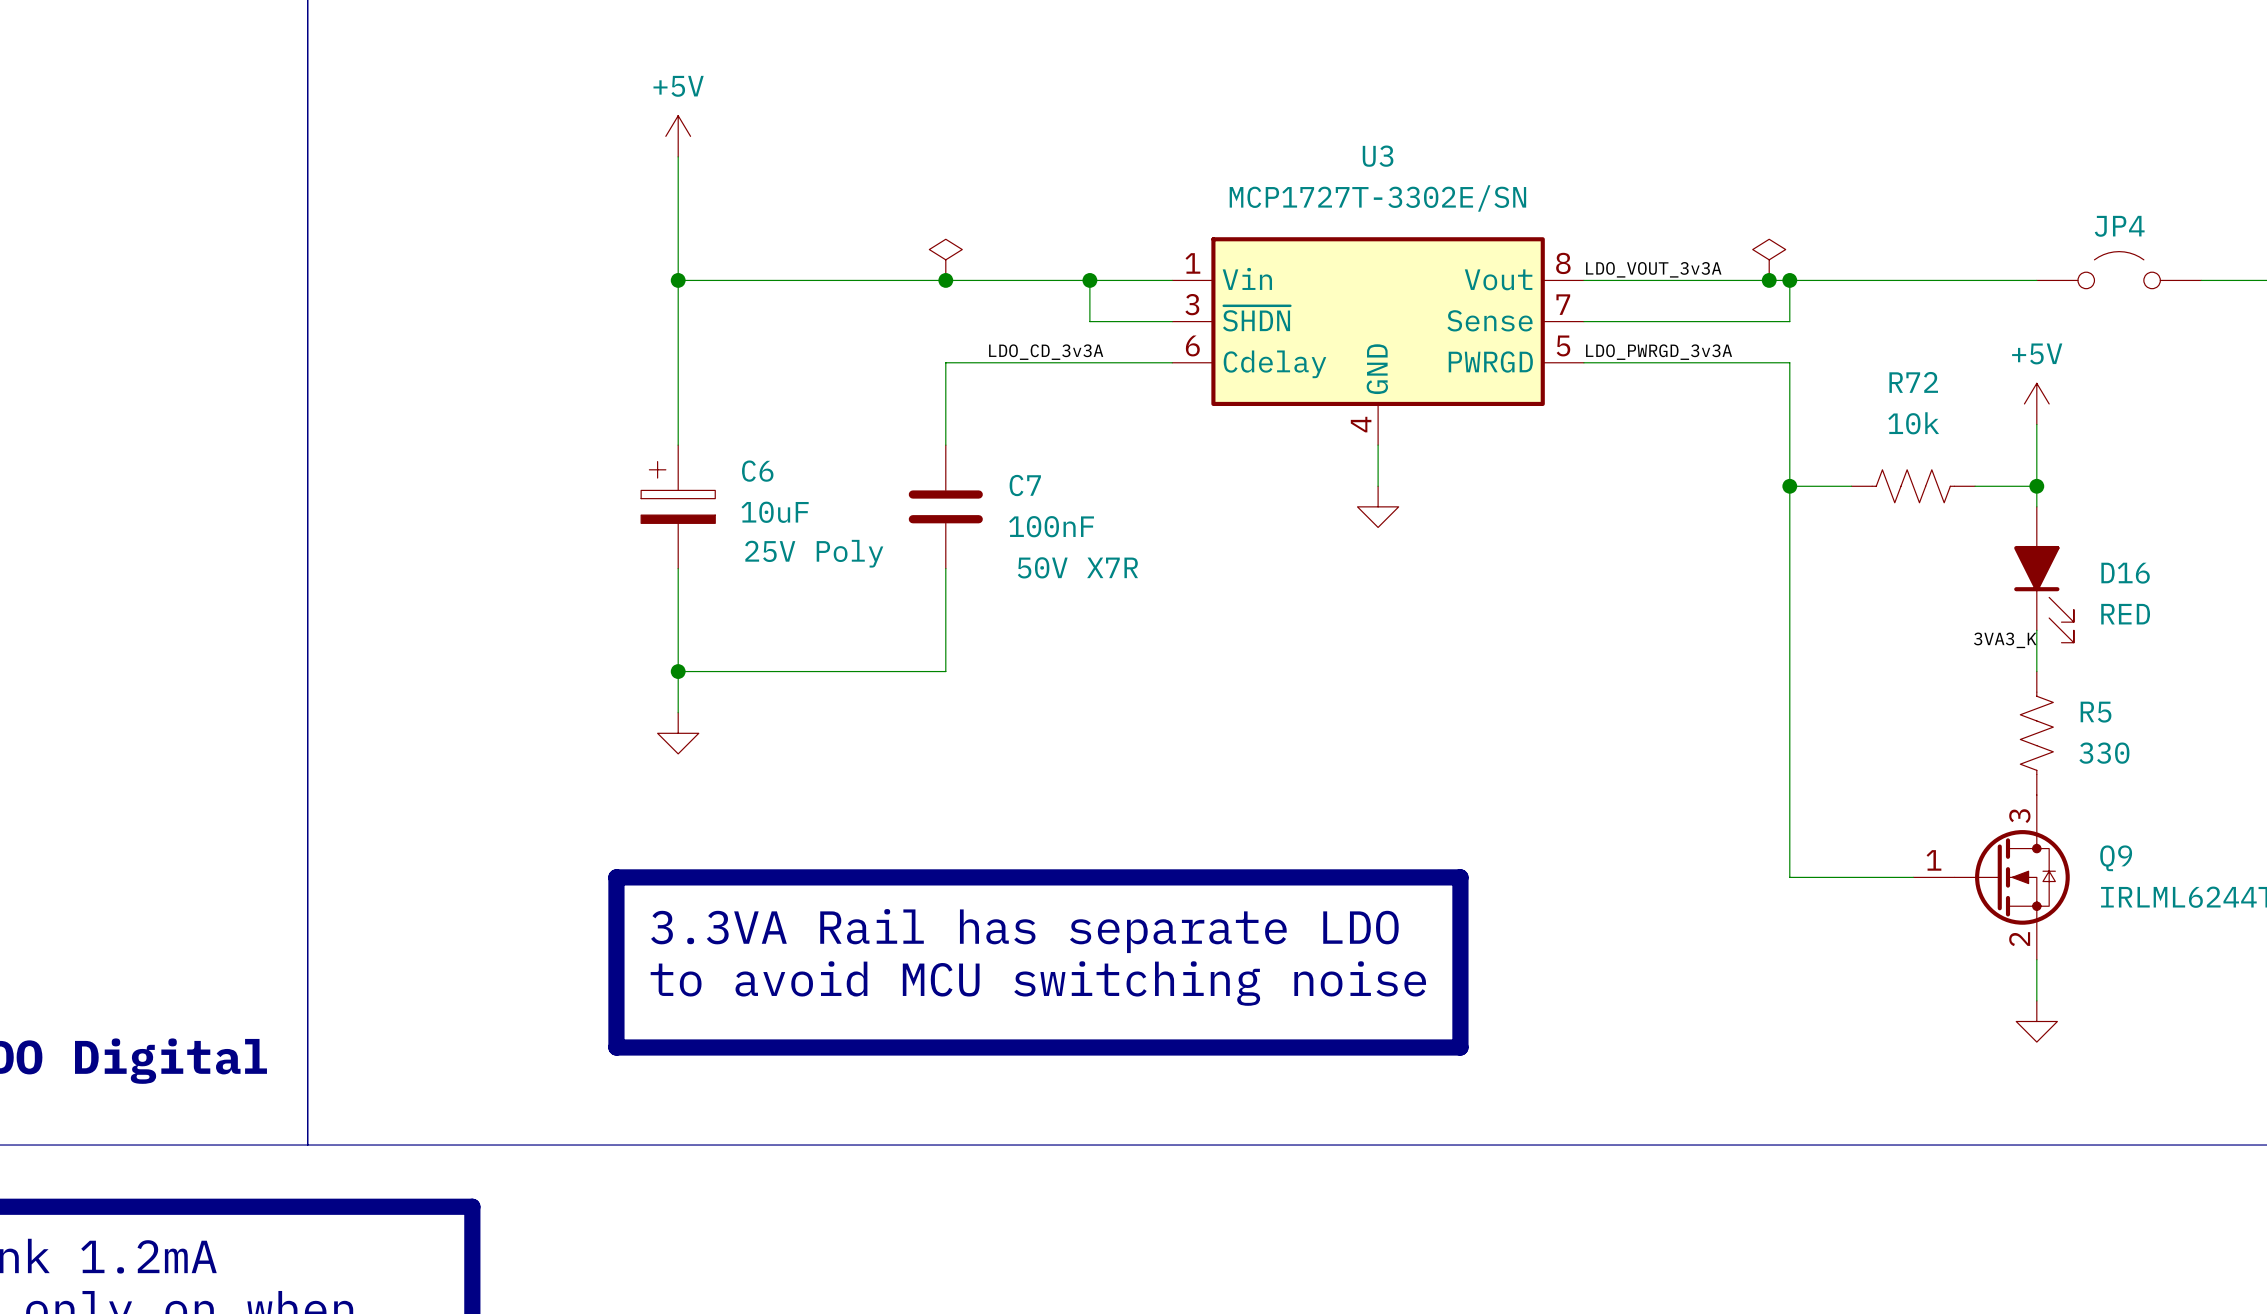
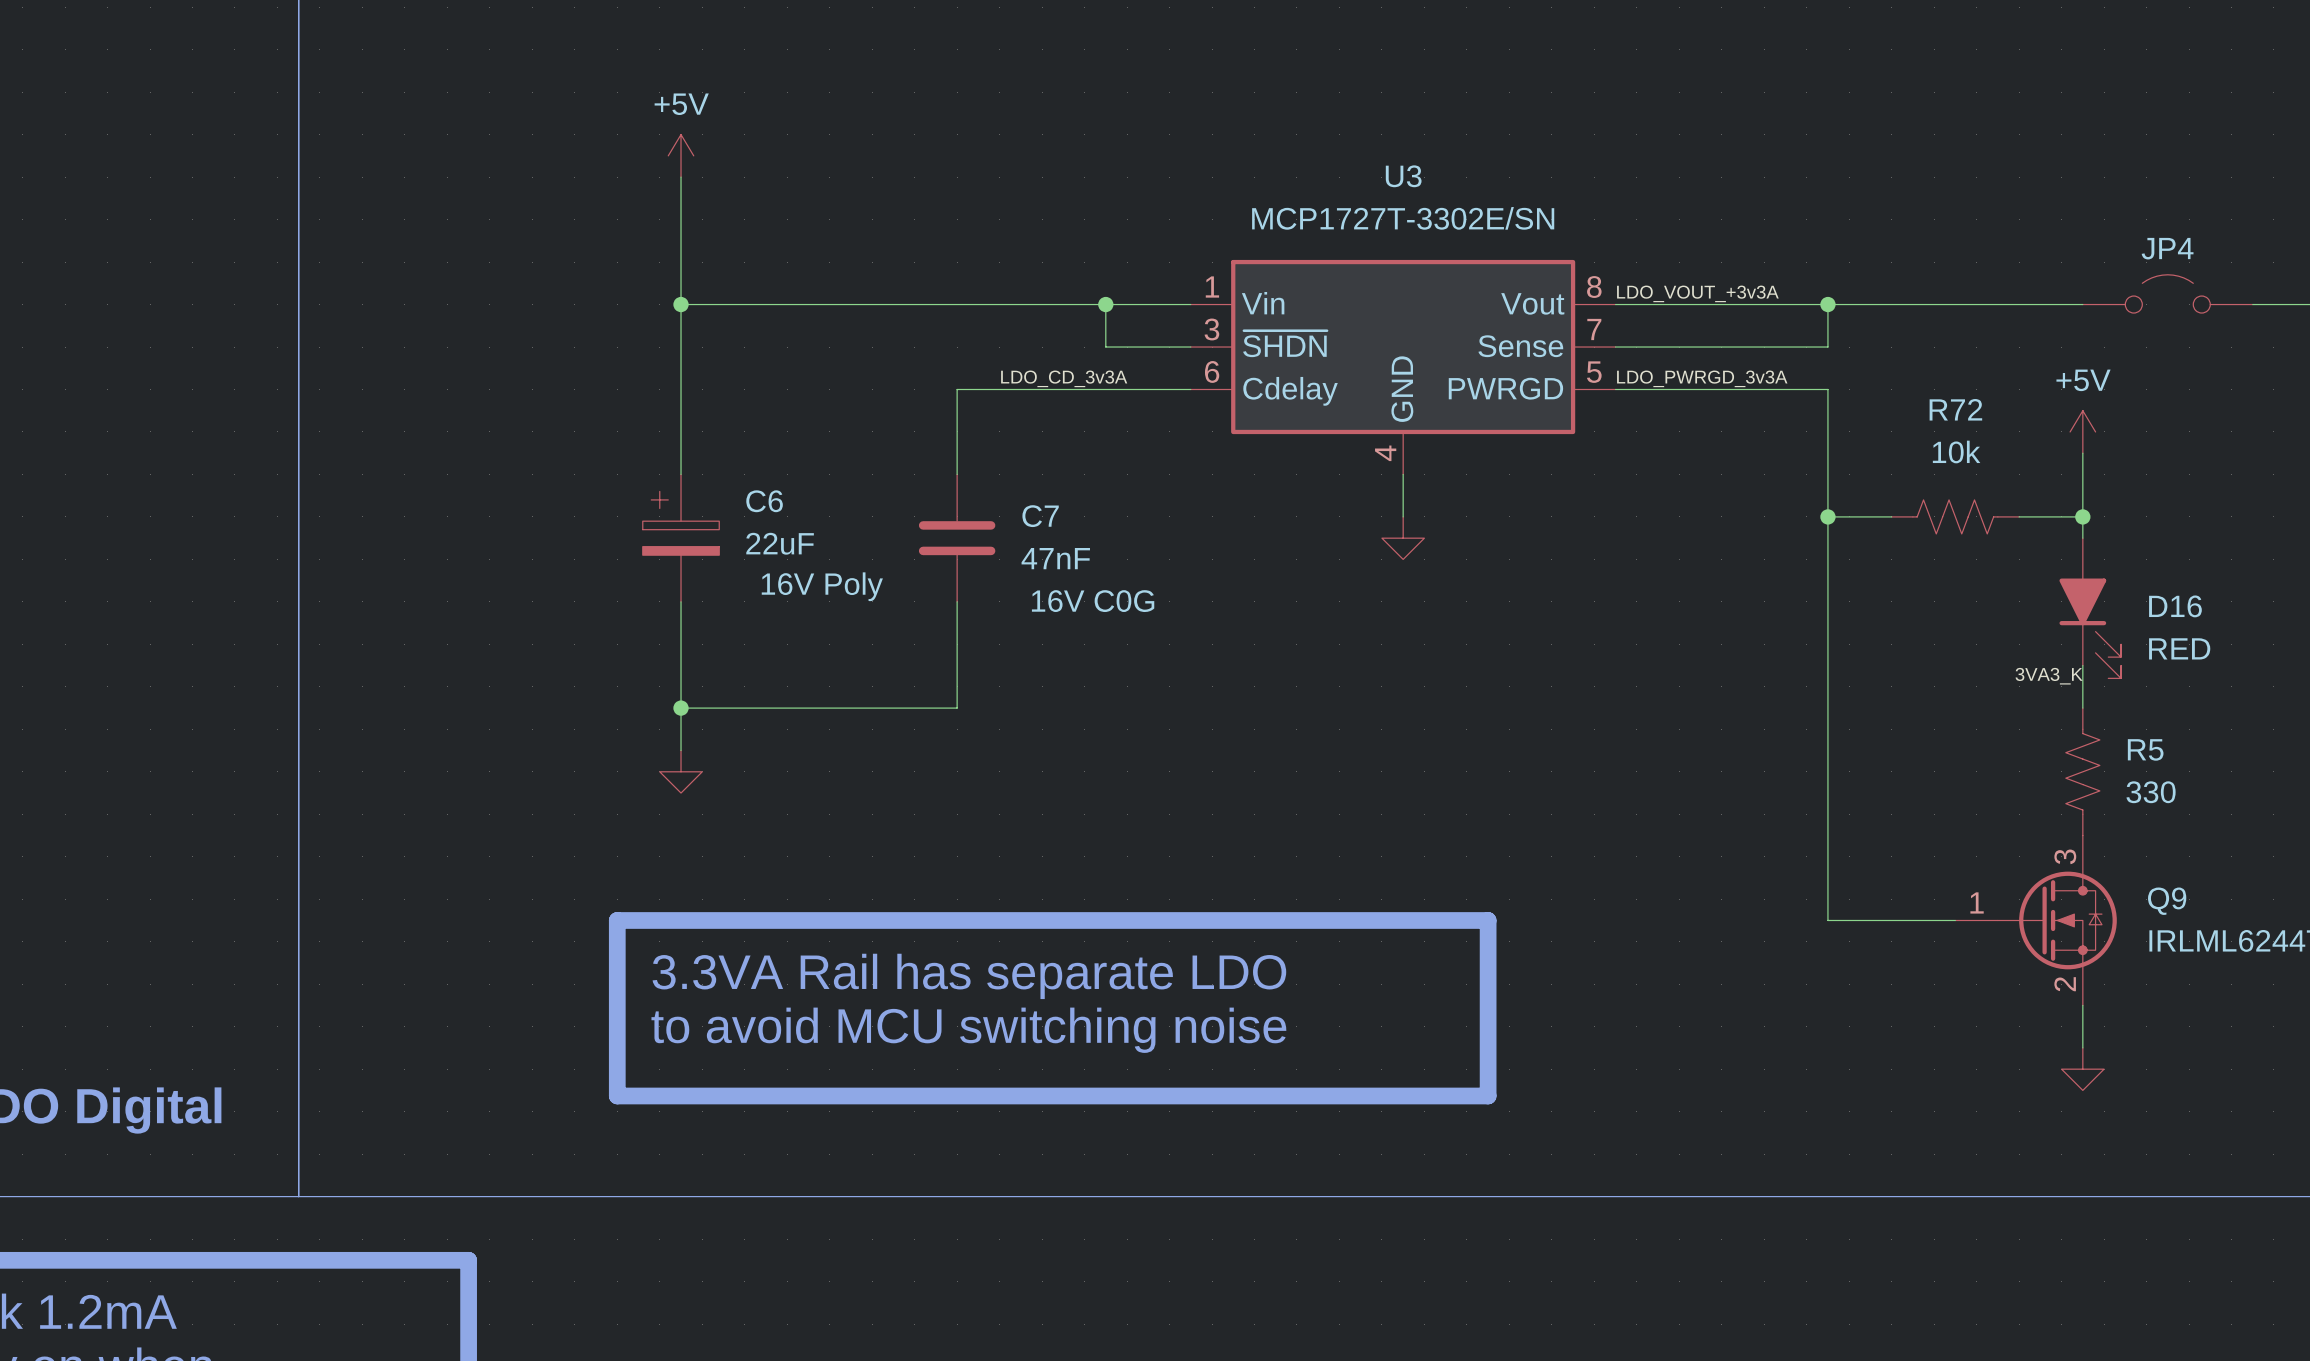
power symbol: (945, 259) -> none
power symbol: (1769, 259) -> none
label: LDO_VOUT_3v3A (1653, 269) -> LDO_VOUT_+3v3A (1697, 293)
junction: (945, 280) -> none
junction: (1769, 280) -> none
C6 value: 10uF (775, 512) -> 22uF (780, 543)
C7 value: 100nF (1051, 526) -> 47nF (1055, 558)
C6 text: 25V Poly (814, 553) -> 16V Poly (822, 586)
C7 text: 50V X7R (1077, 567) -> 16V C0G (1093, 601)

